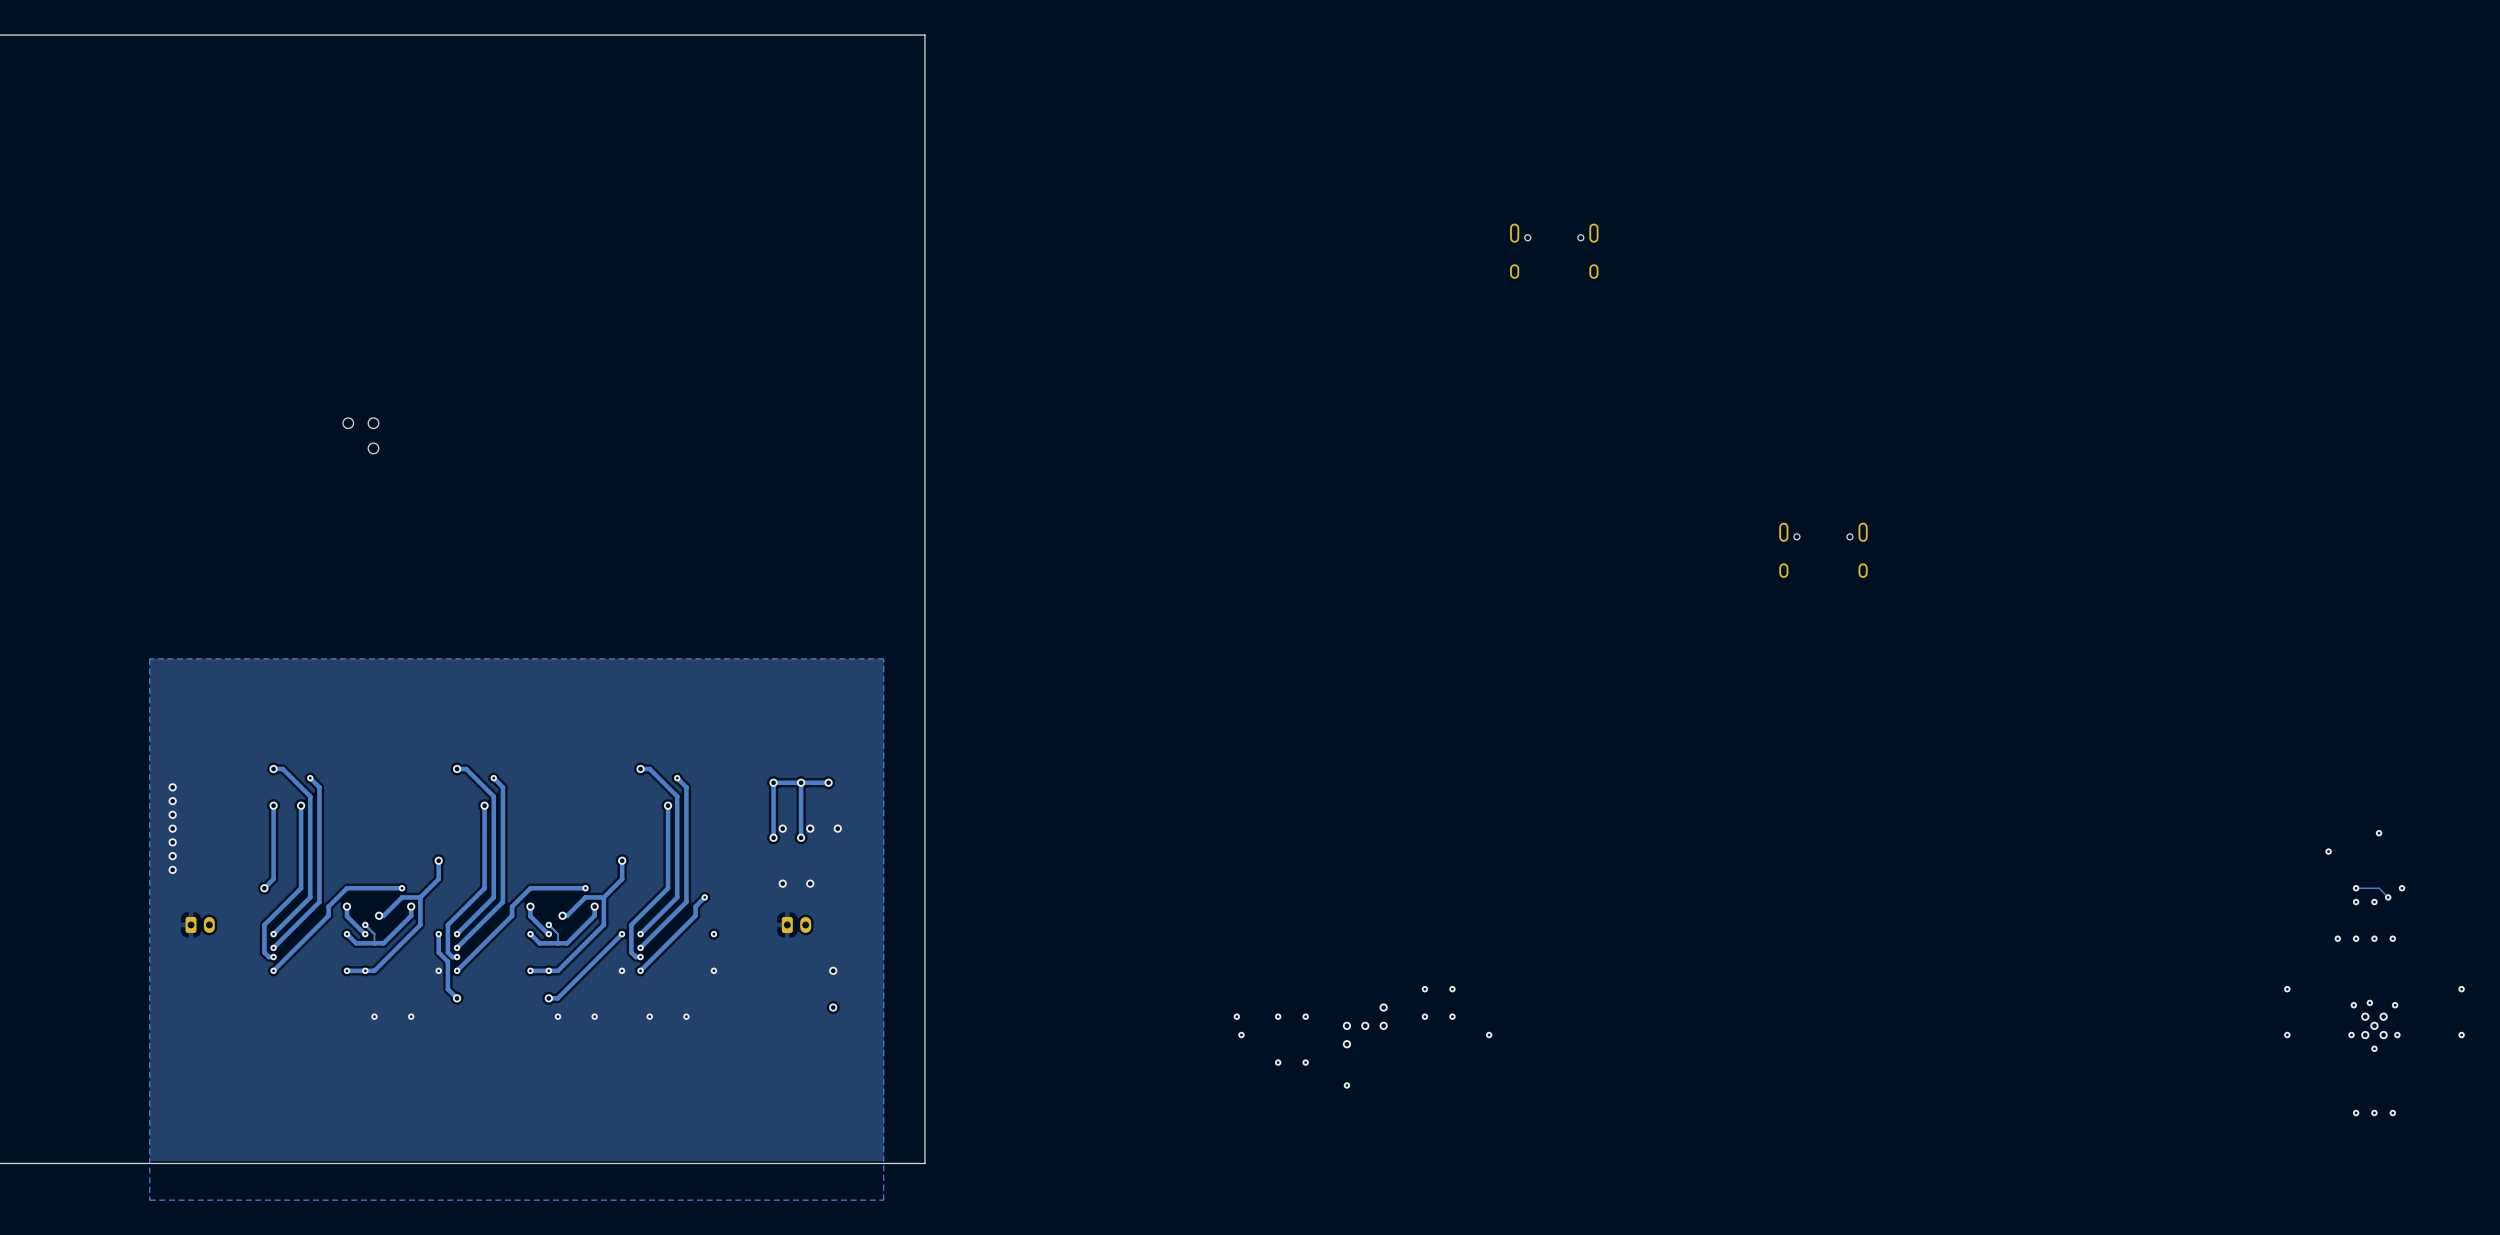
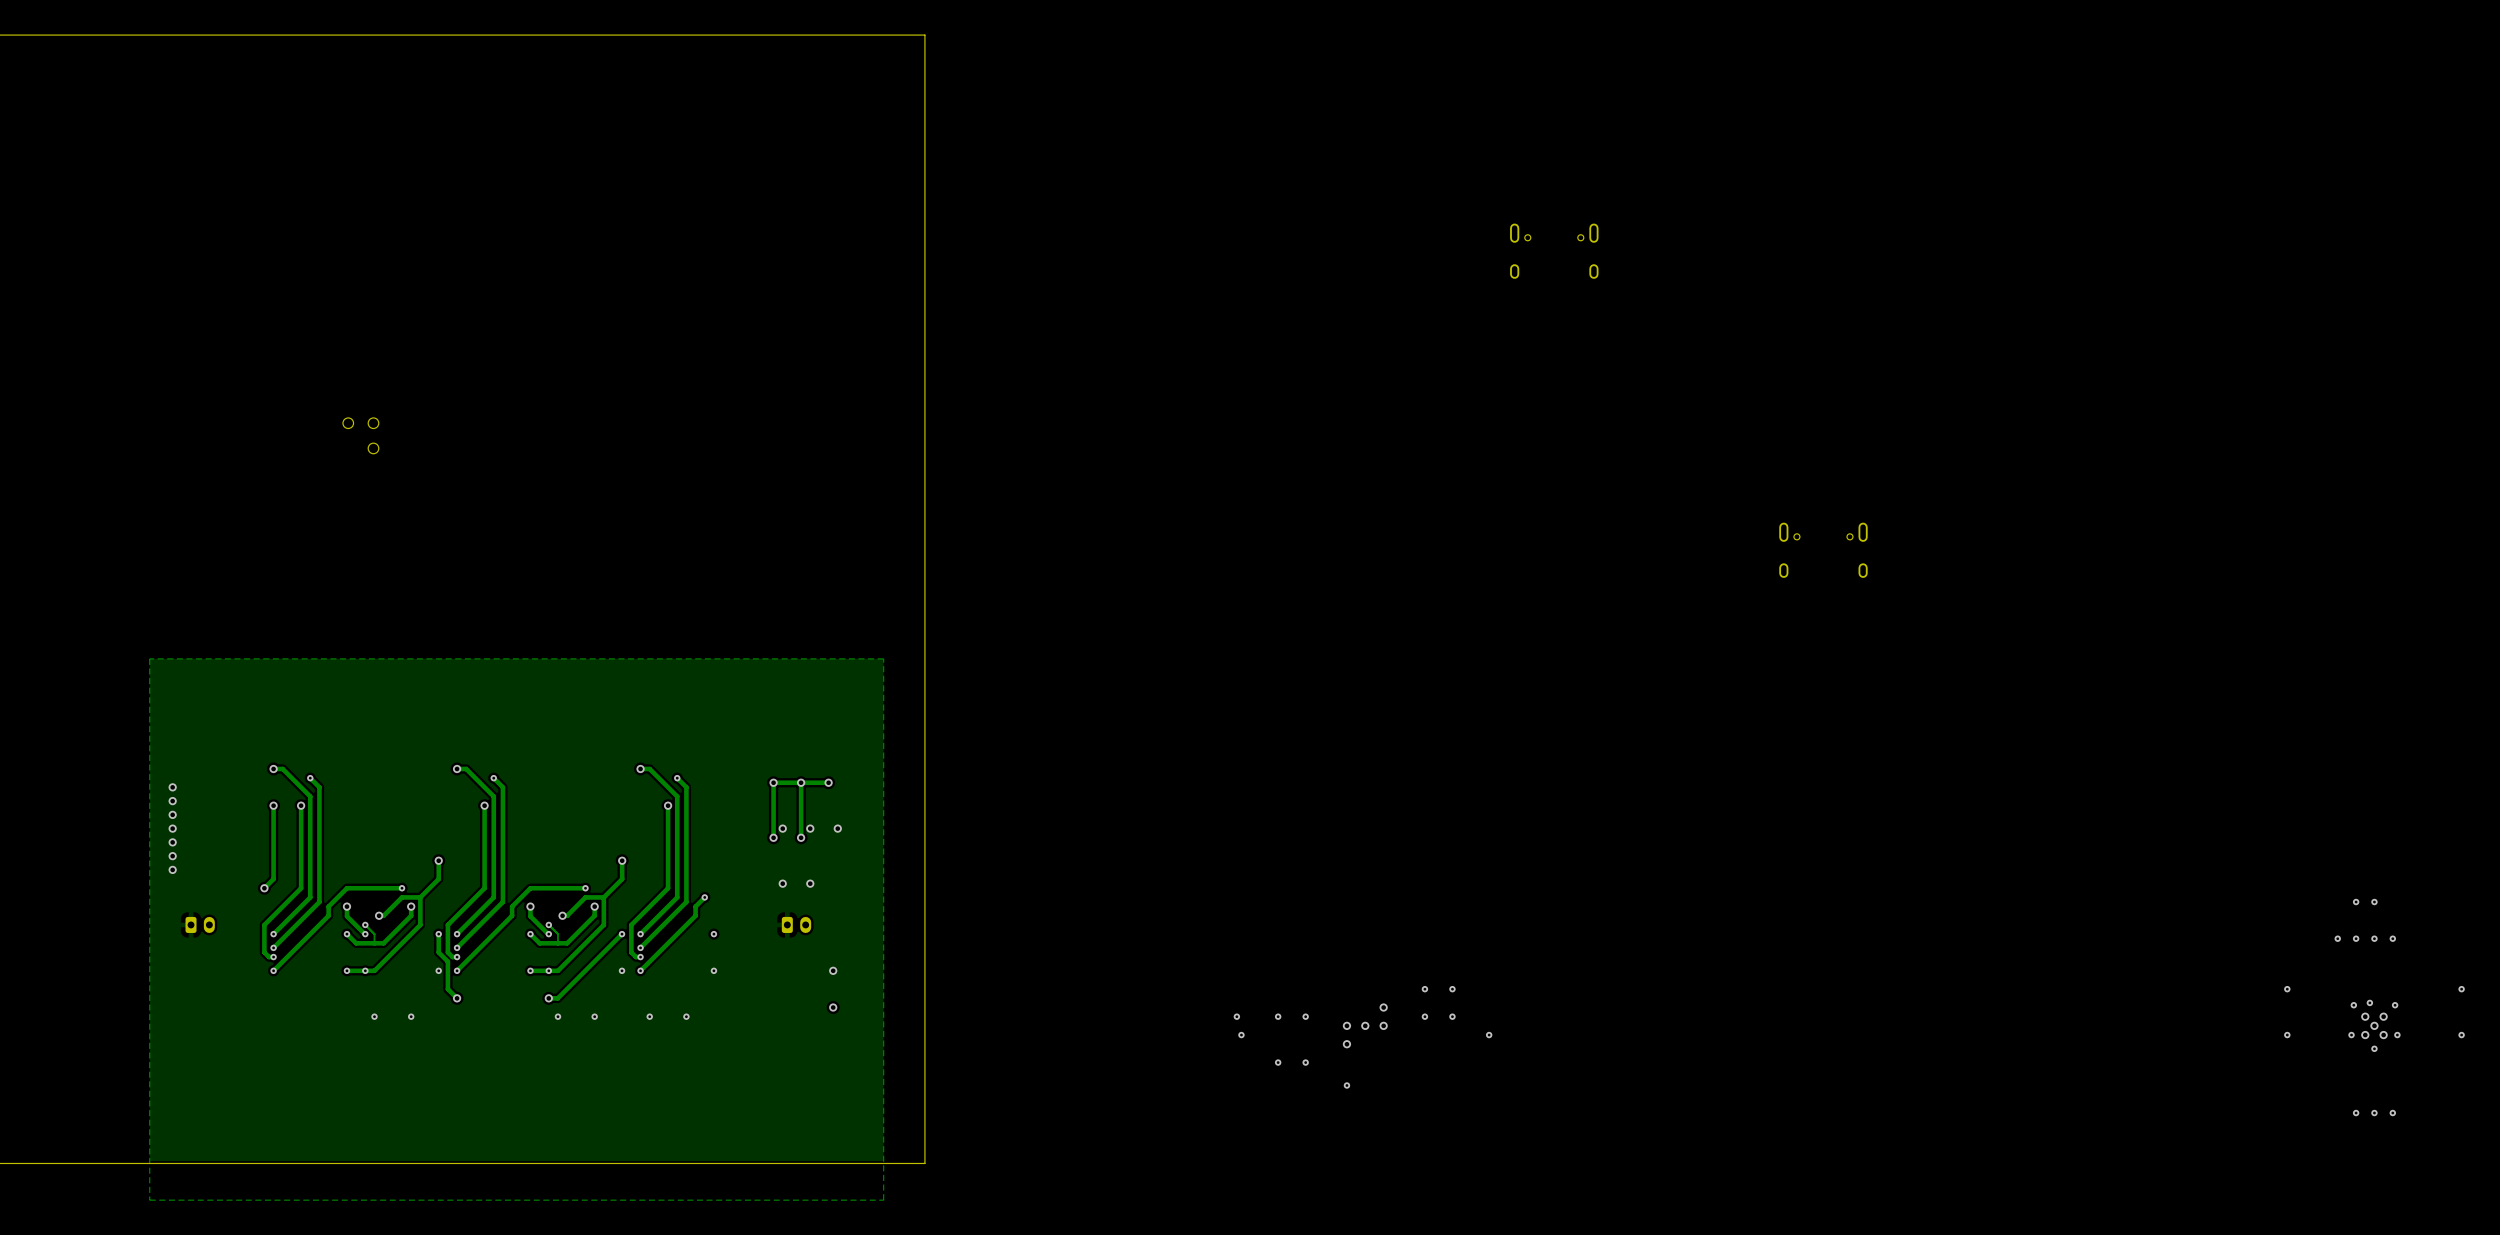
via: (2379, 833) -> none
via: (2328, 851) -> none
track: (2356, 888) (2379, 888) (2388, 897) -> none
via: (2356, 888) -> none
via: (2401, 888) -> none
via: (2388, 897) -> none

